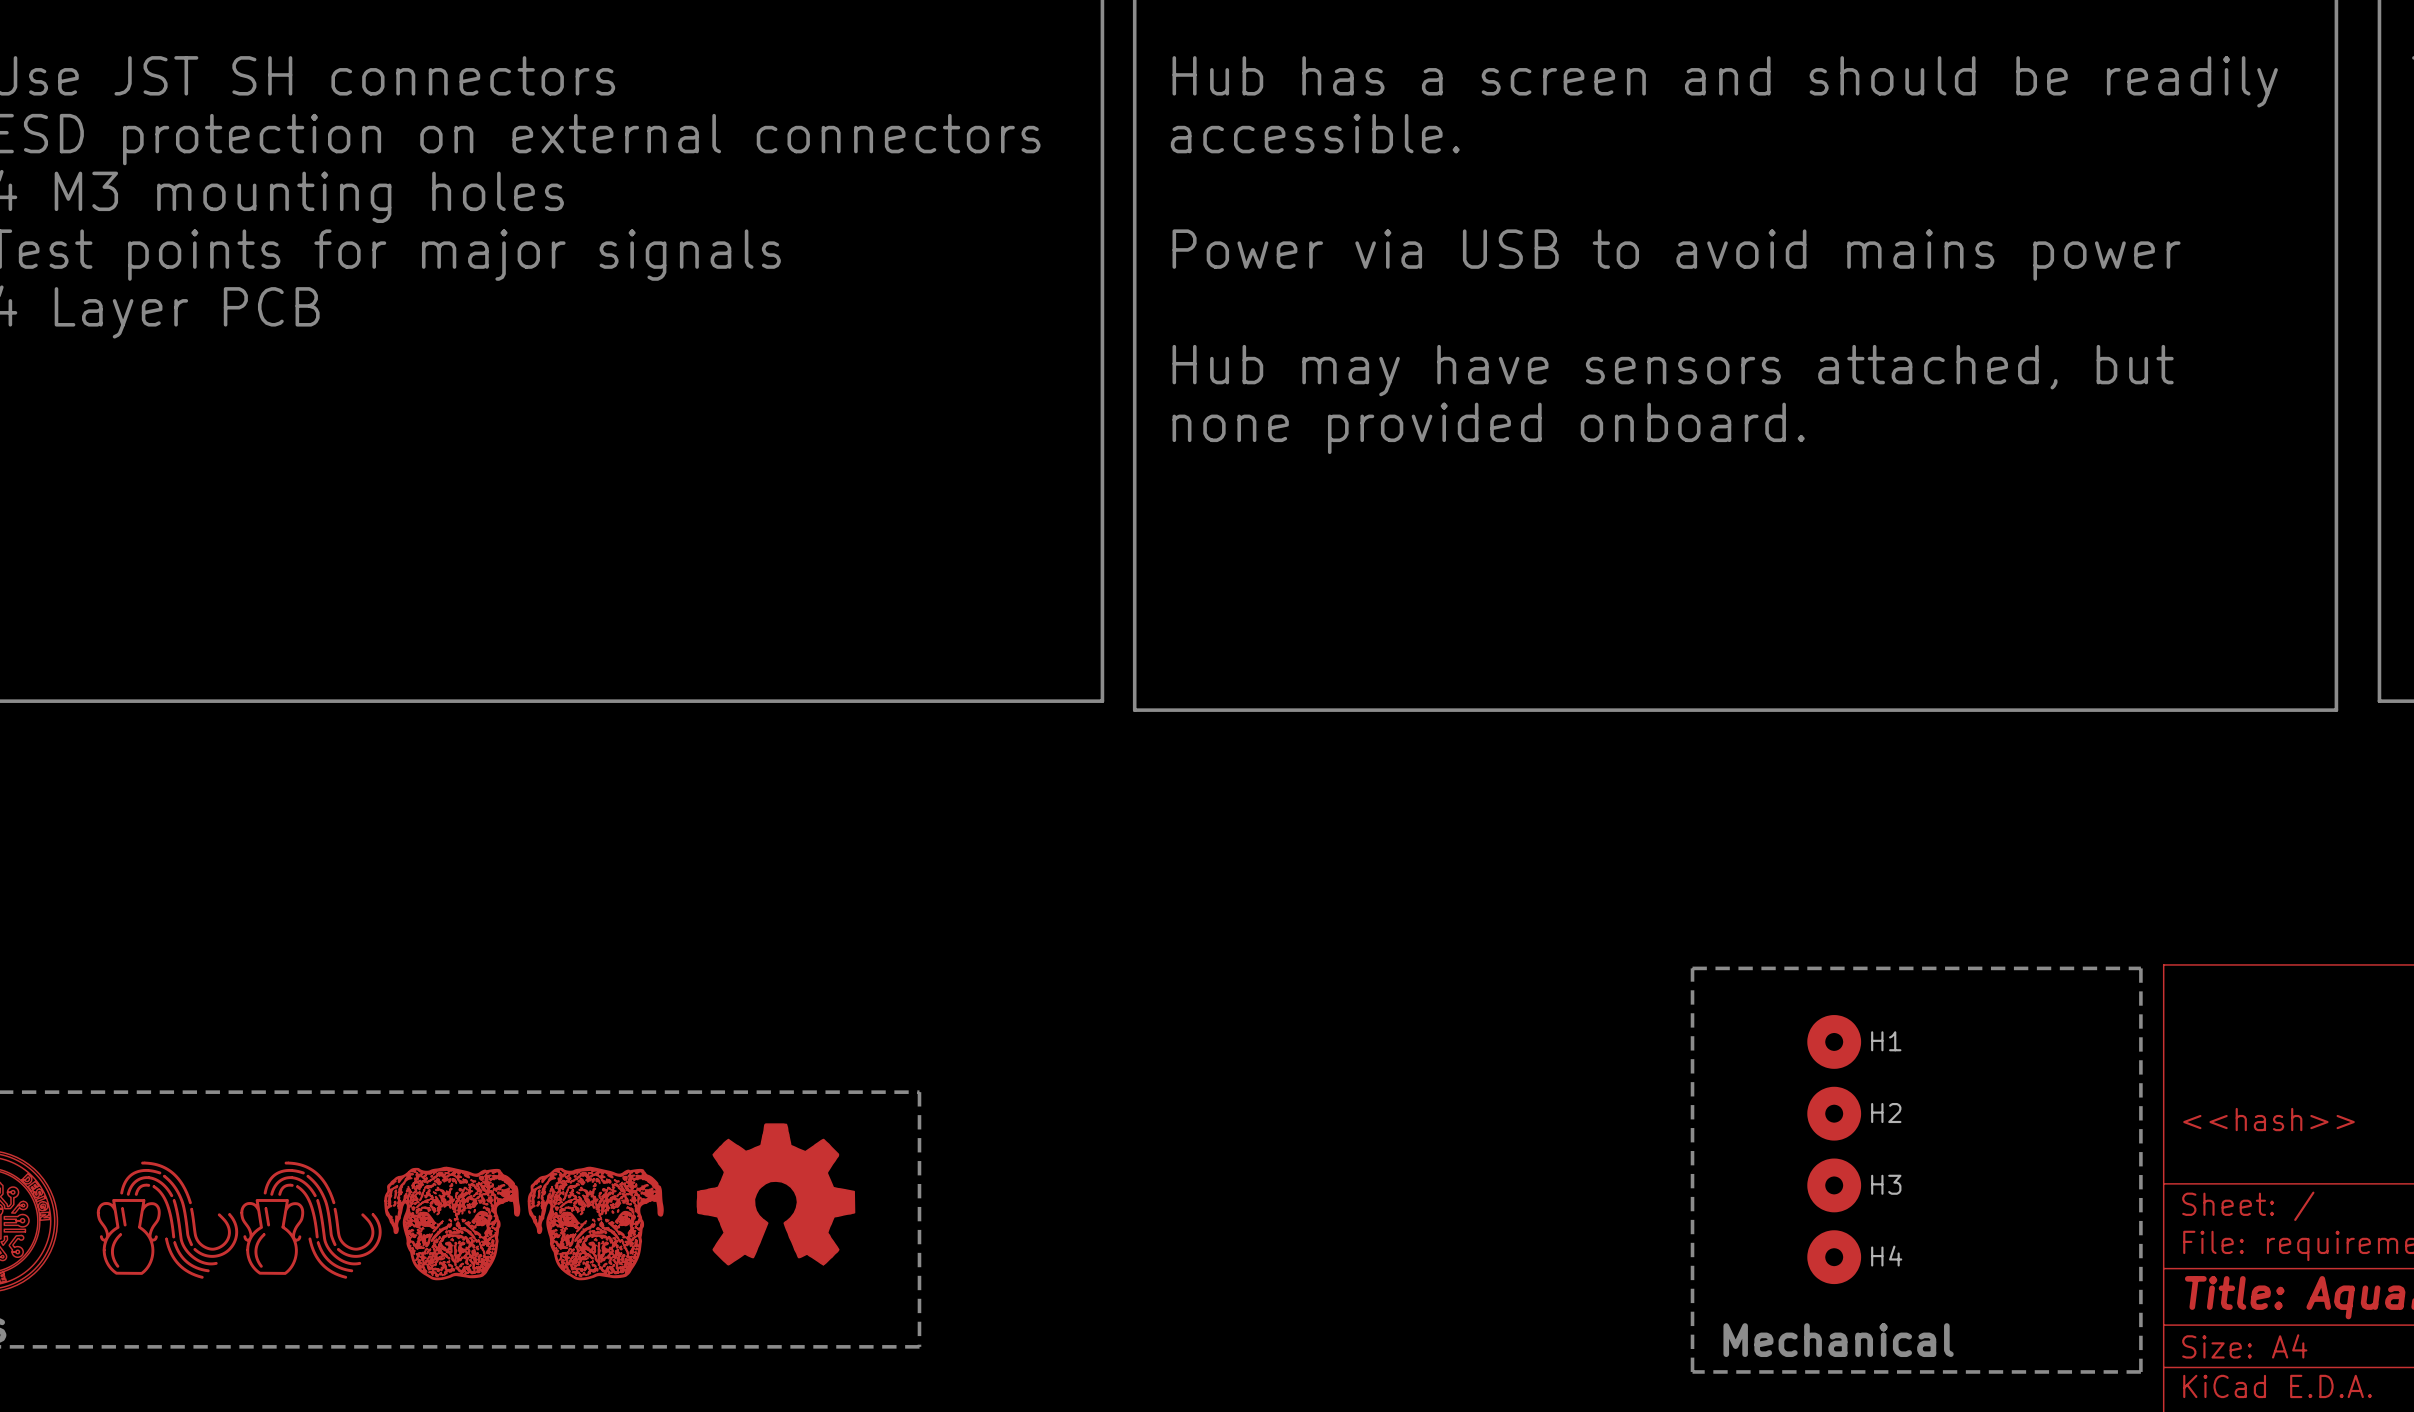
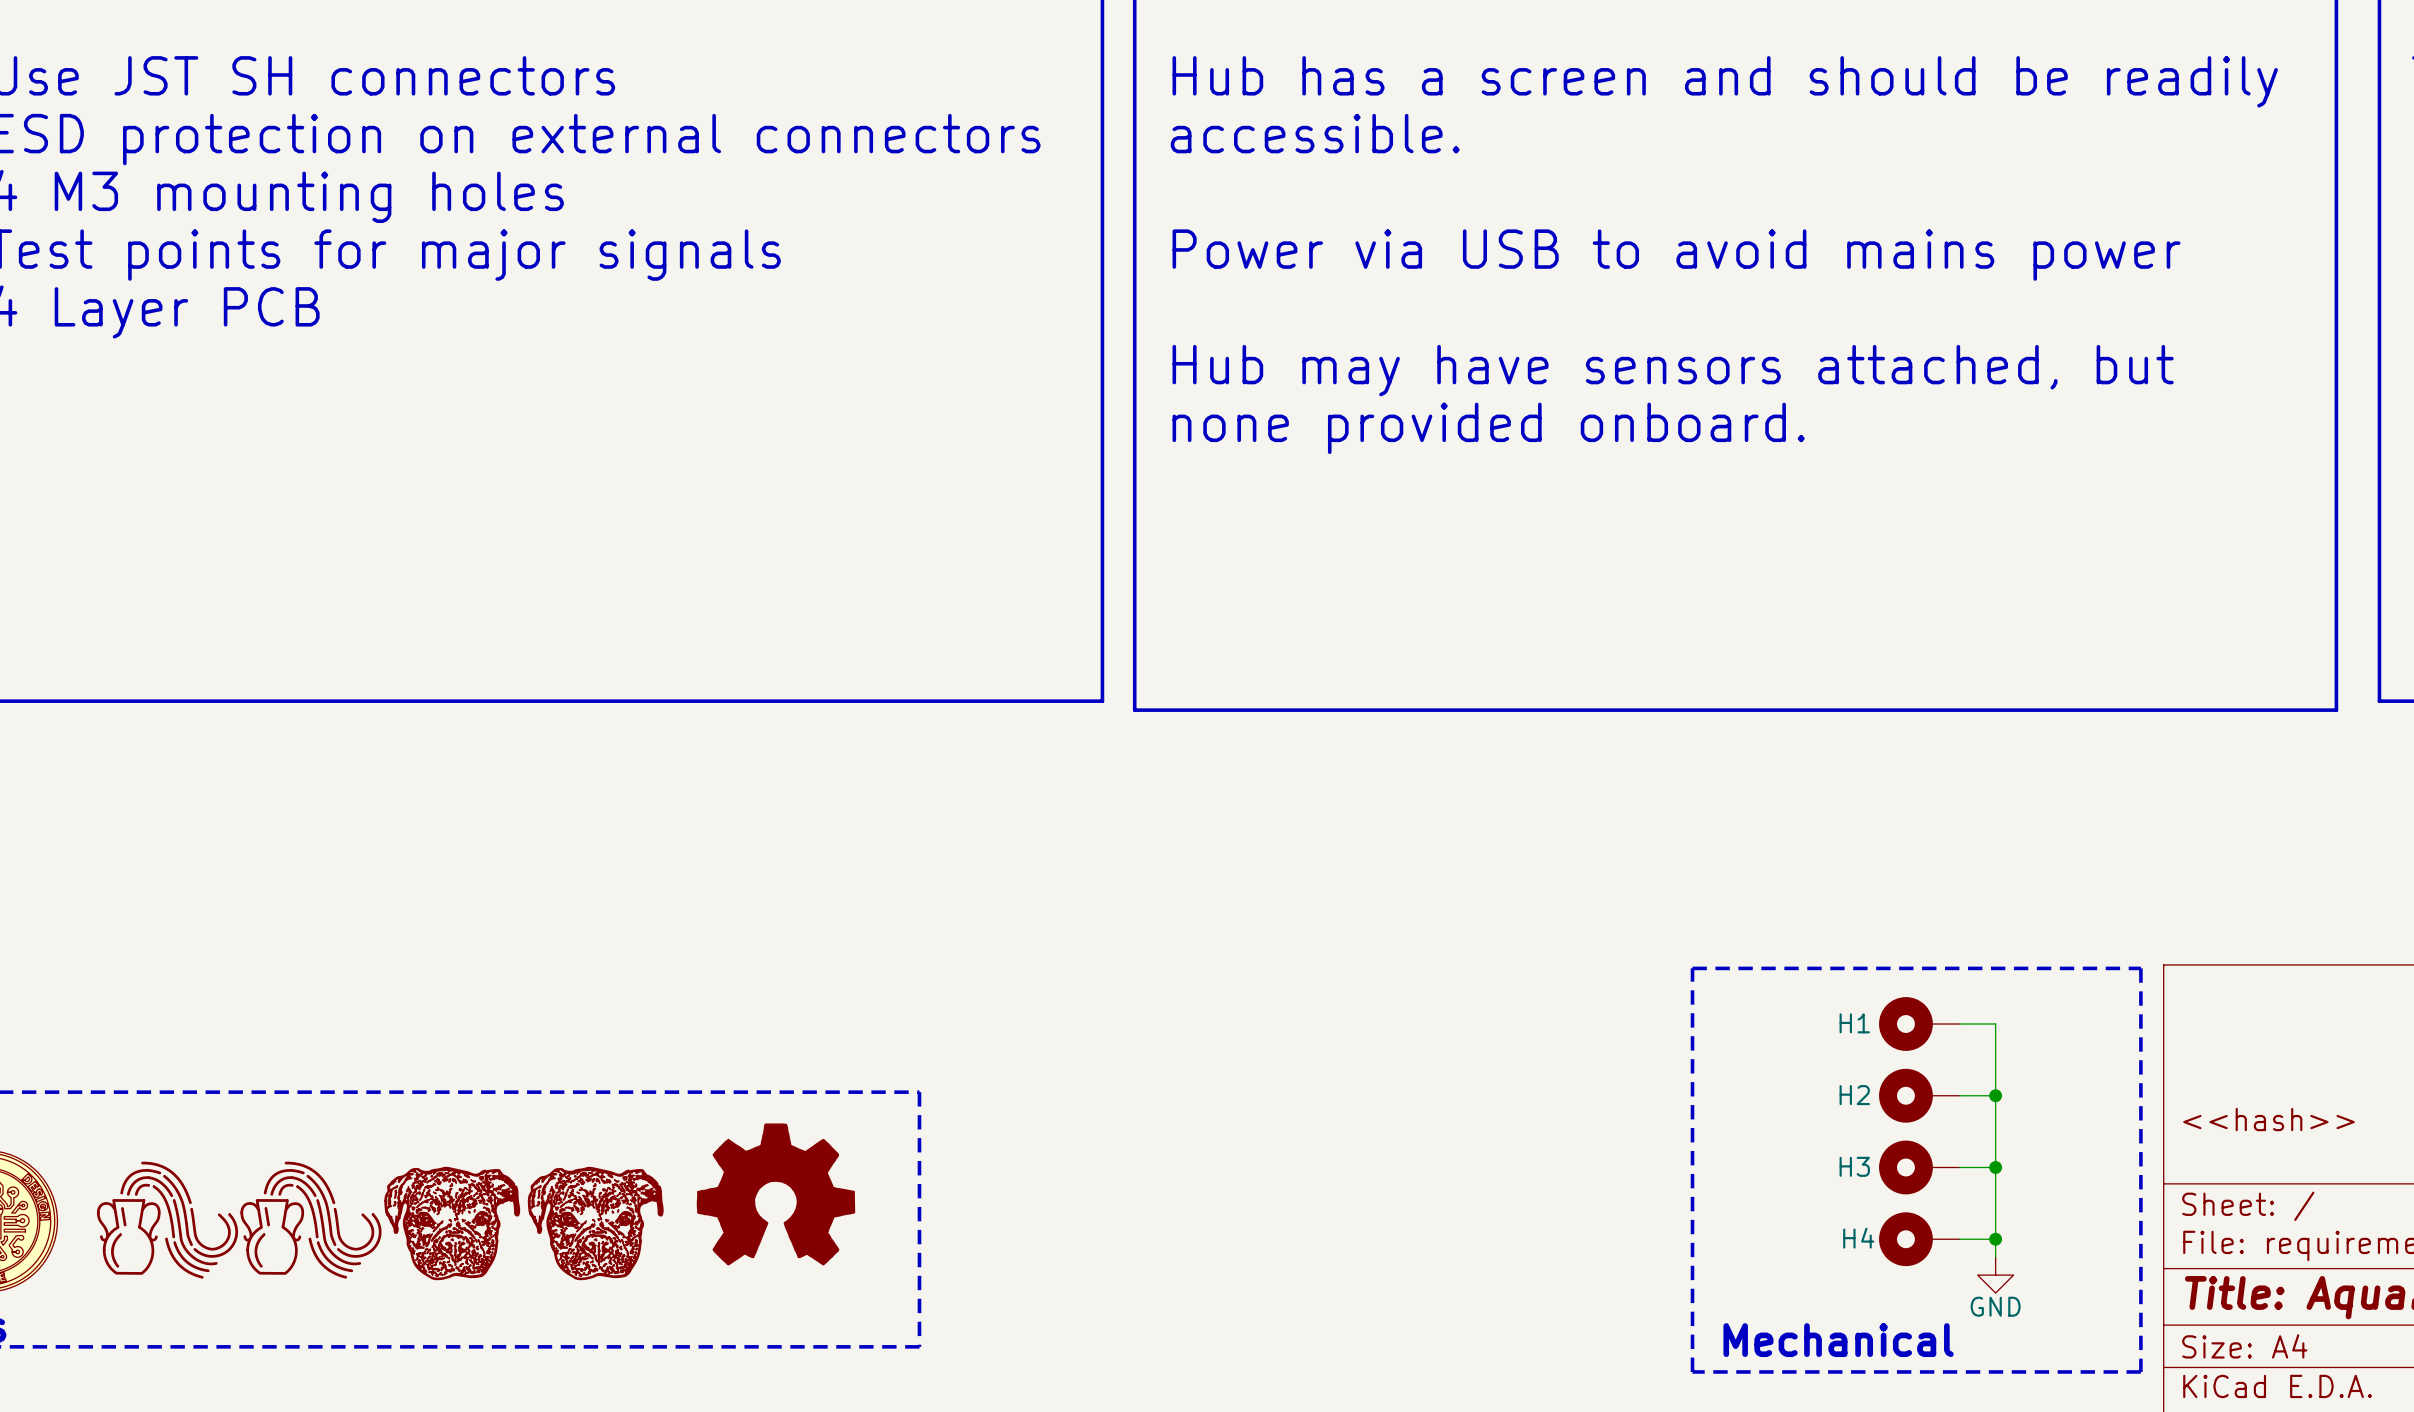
H1 symbol: [1807, 1015, 1862, 1069] -> [1879, 997, 1960, 1051]
wire: none -> (1959, 1024) (1995, 1024) (1995, 1257)
H1 name position: H1 (1886, 1041) -> H1 (1854, 1023)
H2 symbol: [1807, 1086, 1862, 1141] -> [1879, 1068, 1960, 1123]
wire: none -> (1959, 1095) (1995, 1095)
junction: none -> (1995, 1095)
H2 name position: H2 (1886, 1113) -> H2 (1854, 1095)
H3 symbol: [1807, 1158, 1862, 1213] -> [1879, 1140, 1960, 1195]
wire: none -> (1959, 1167) (1995, 1167)
junction: none -> (1995, 1167)
H3 name position: H3 (1886, 1184) -> H3 (1854, 1166)
H4 symbol: [1807, 1230, 1862, 1285] -> [1879, 1212, 1960, 1267]
wire: none -> (1959, 1239) (1995, 1239)
junction: none -> (1995, 1239)
H4 name position: H4 (1886, 1256) -> H4 (1858, 1238)
power symbol: none -> GND (1995, 1275)

